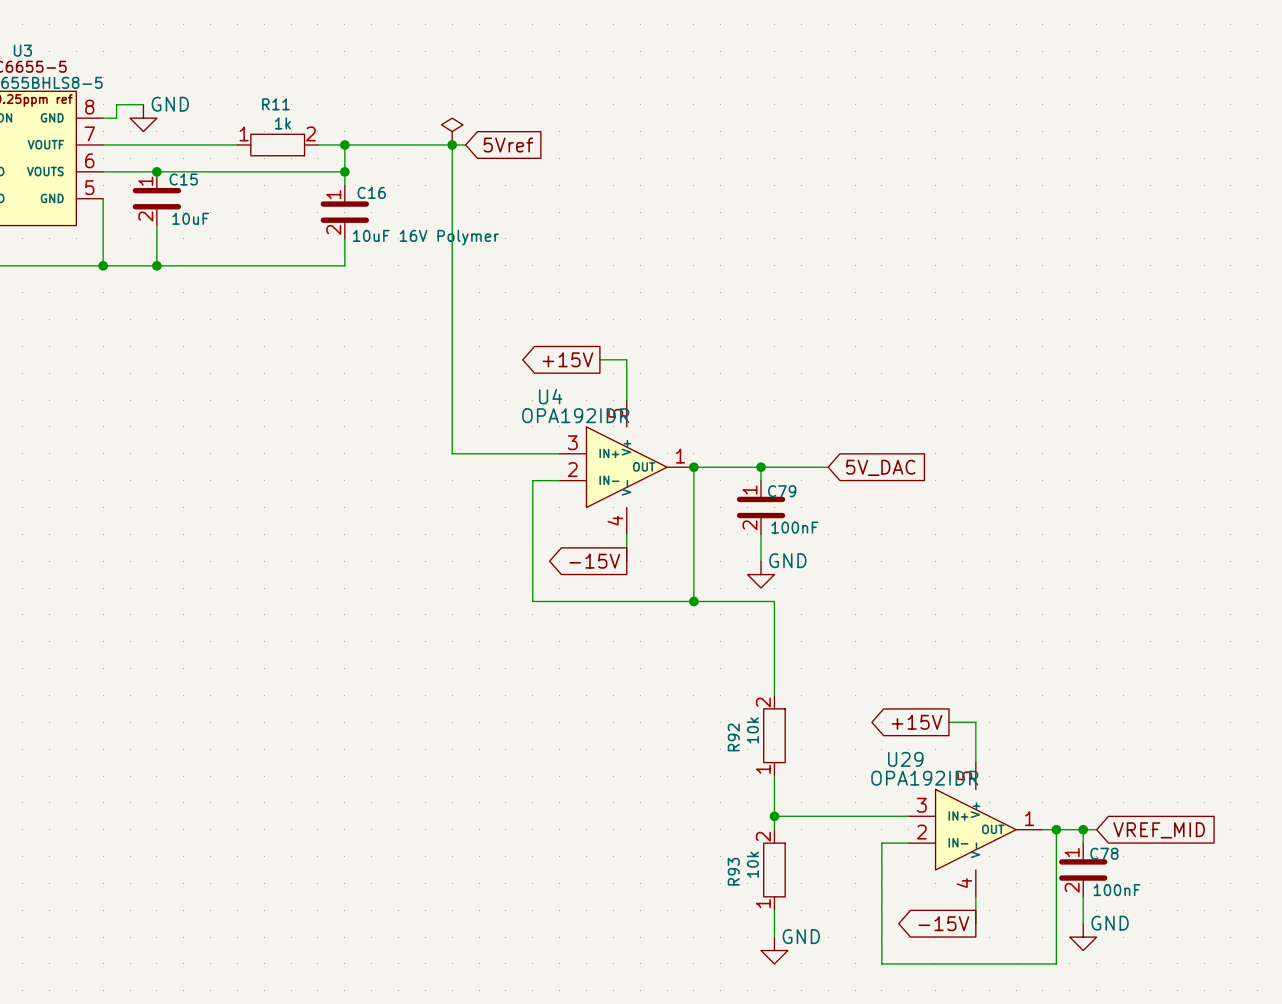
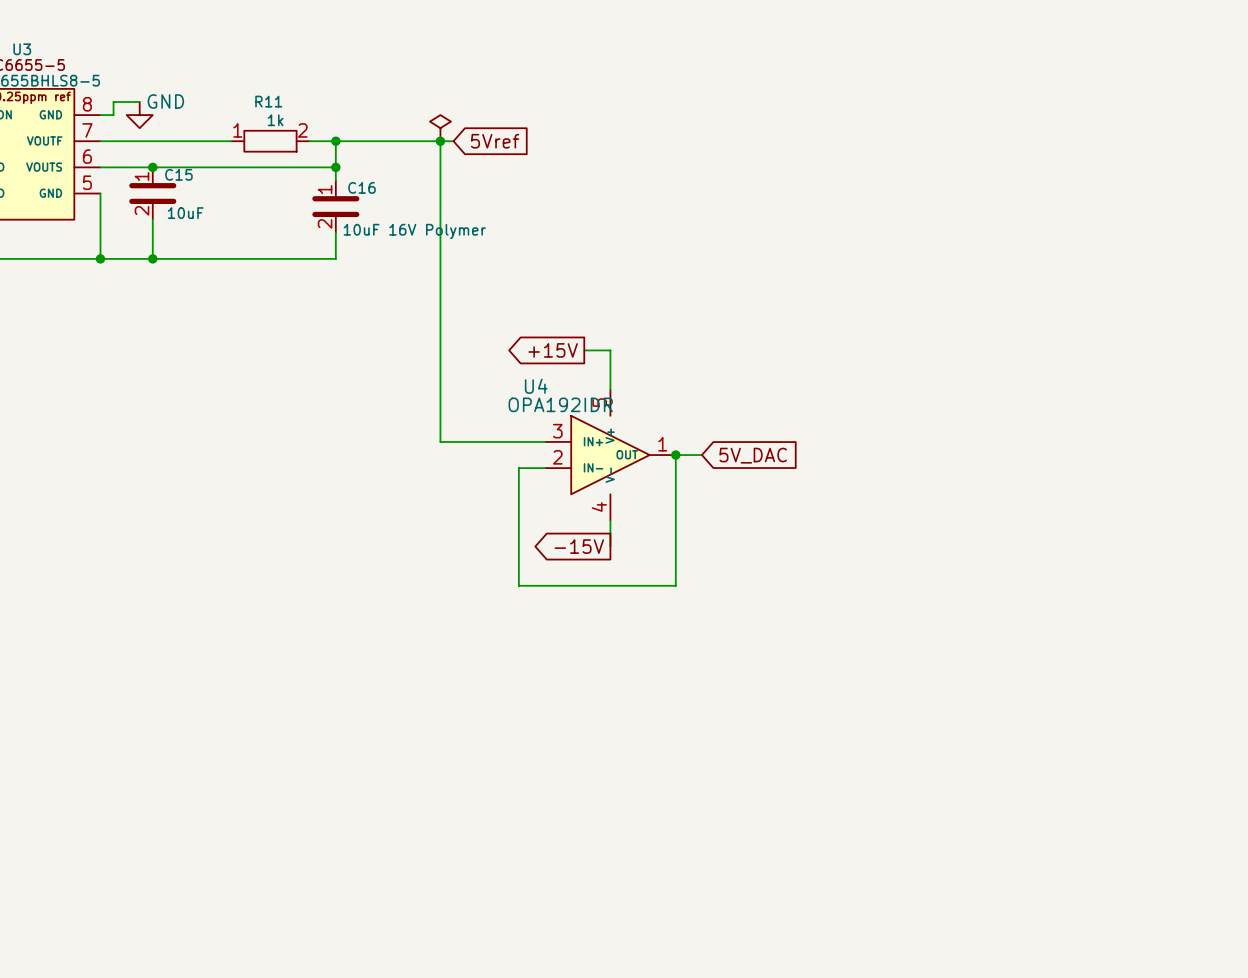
wire: (720, 467) (828, 467) -> none
wire: (761, 467) (761, 480) -> none
junction: (761, 467) -> none
global label position: 5V_DAC (880, 467) -> 5V_DAC (753, 455)
C79: 100nF (761, 507) -> none
wire: (761, 534) (761, 561) -> none
power symbol: GND (761, 574) -> none
wire: (693, 601) (774, 601) (774, 695) -> none
junction: (693, 601) -> none
global label: +15V (916, 722) -> none
wire: (948, 722) (975, 722) (975, 762) -> none
R92: 10k (774, 735) -> none
wire: (774, 776) (774, 829) -> none
wire: (774, 816) (908, 816) -> none
junction: (774, 816) -> none
U29: OPA192IDR (975, 829) -> none
wire: (1042, 829) (1096, 829) -> none
wire: (1056, 829) (1056, 963) (881, 963) (881, 843) (908, 843) -> none
junction: (1056, 829) -> none
wire: (1083, 829) (1083, 843) -> none
junction: (1083, 829) -> none
global label: VREF_MID (1159, 830) -> none
R93: 10k (774, 869) -> none
C78: 100nF (1083, 869) -> none
wire: (975, 896) (975, 923) -> none
wire: (1083, 896) (1083, 923) -> none
wire: (774, 910) (774, 937) -> none
global label: -15V (943, 923) -> none
power symbol: GND (1083, 937) -> none
power symbol: GND (774, 950) -> none

